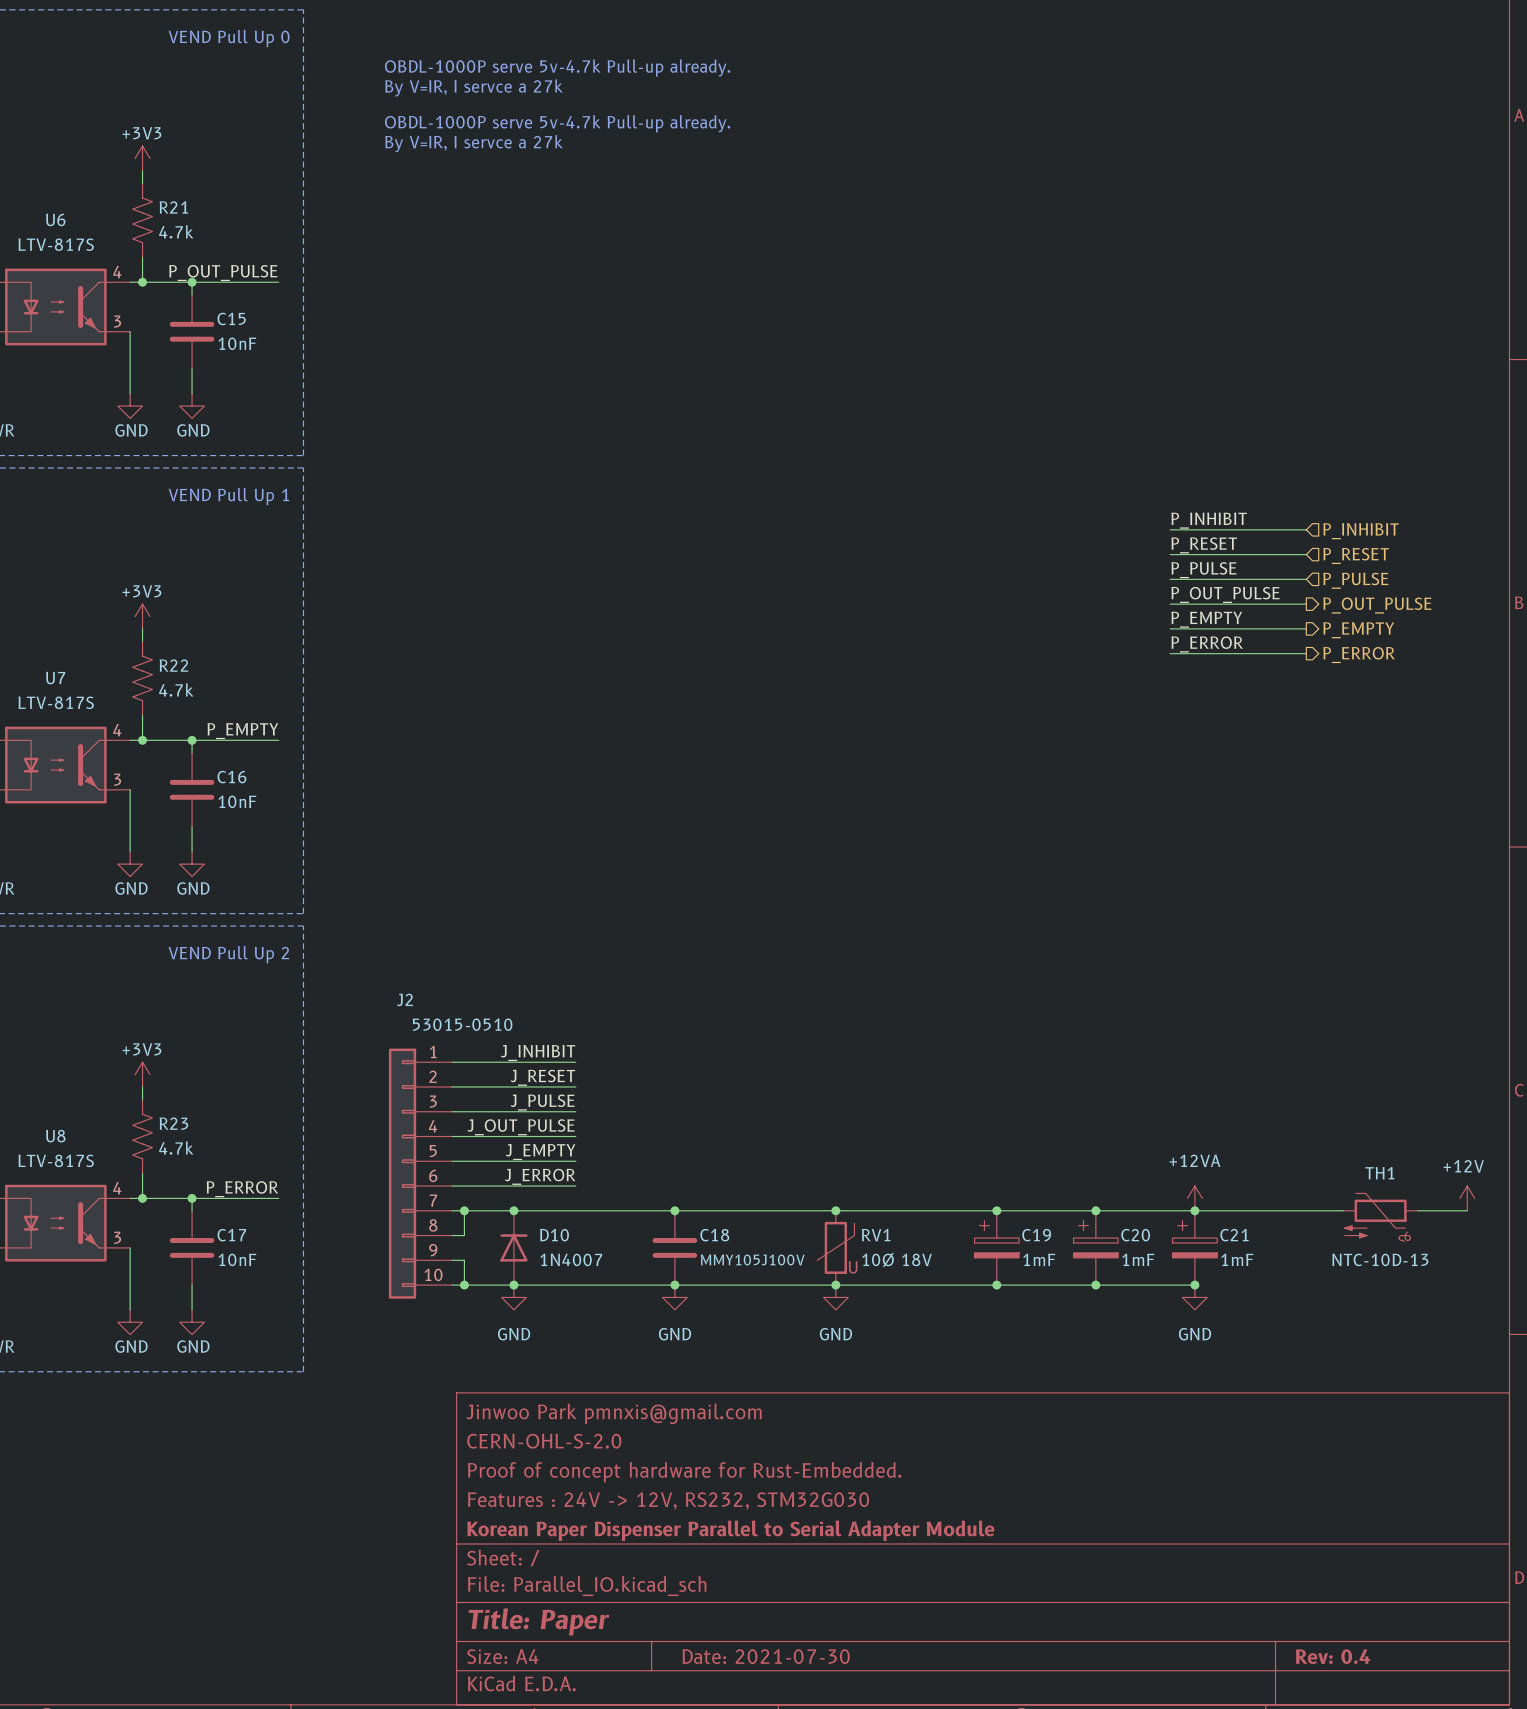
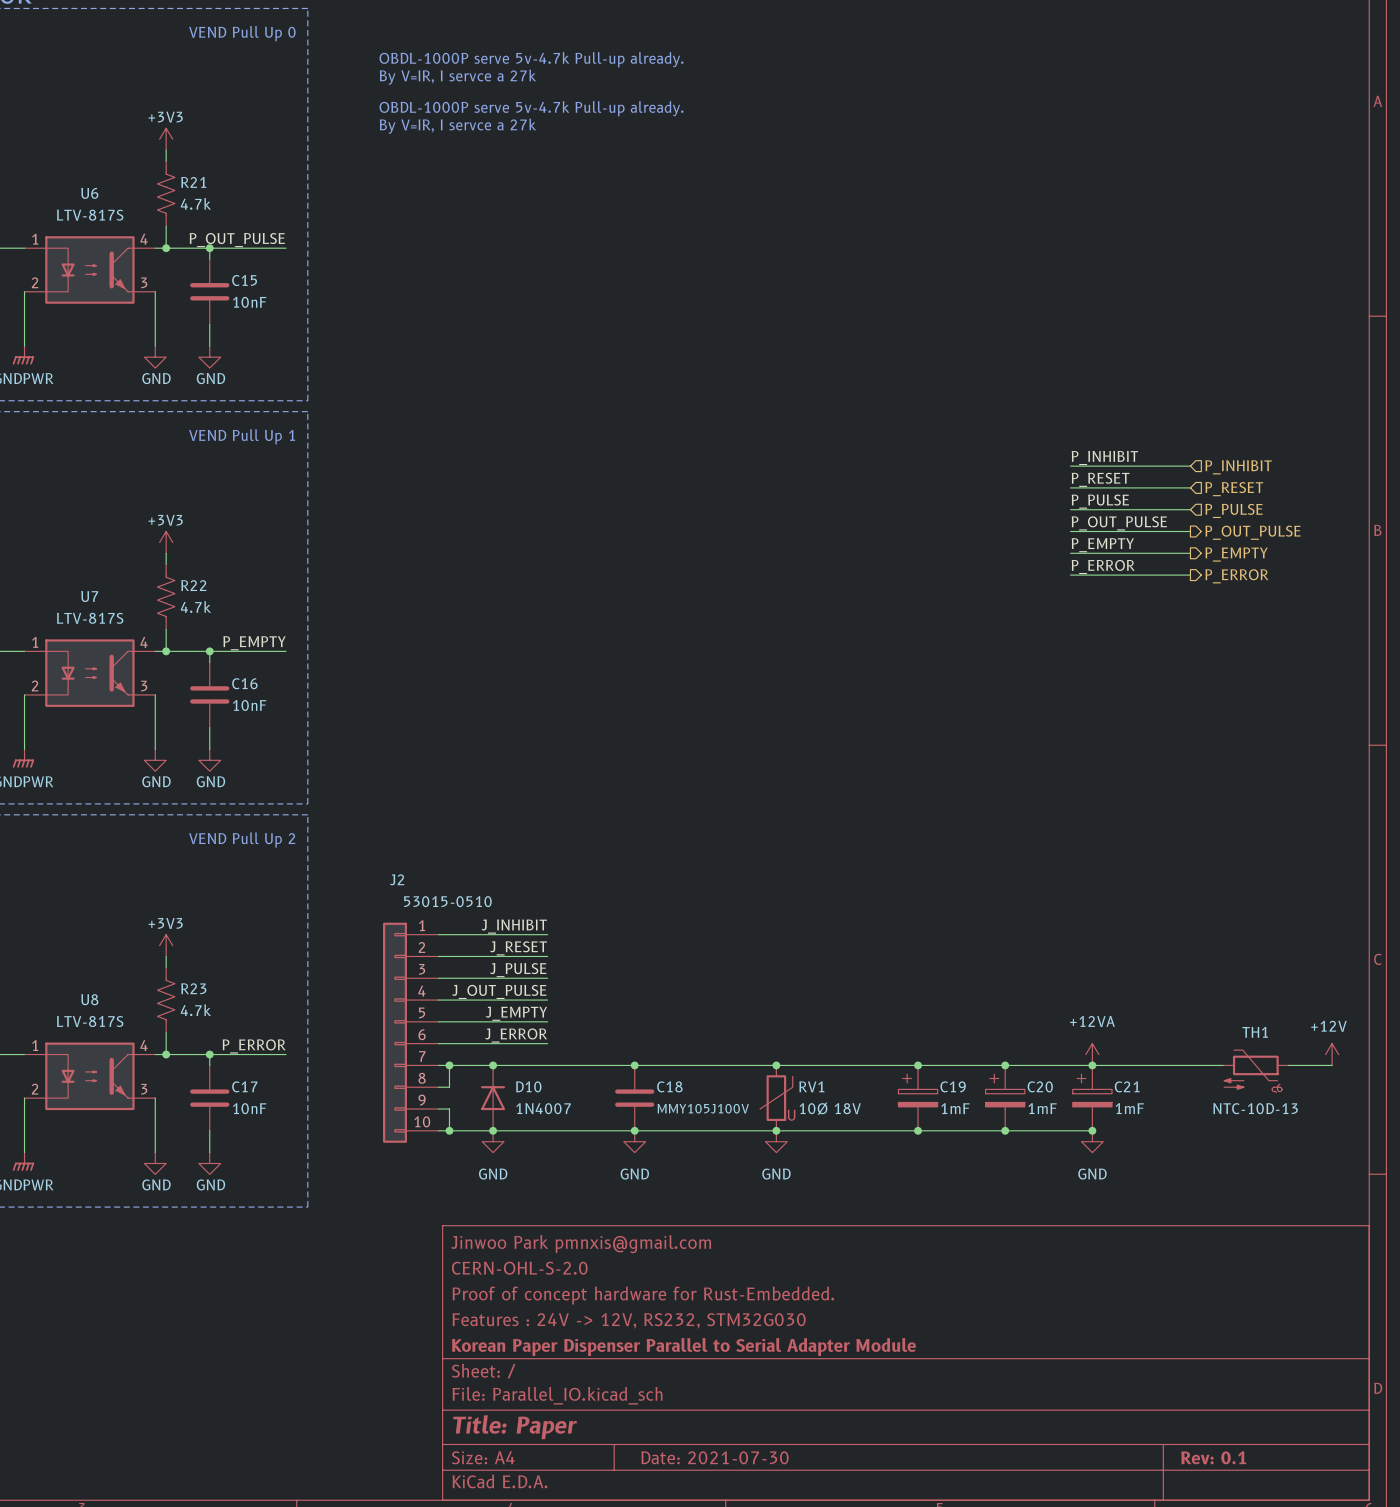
title block: Rev: 0.4 (1333, 1656) -> Rev: 0.1 (1213, 1457)

